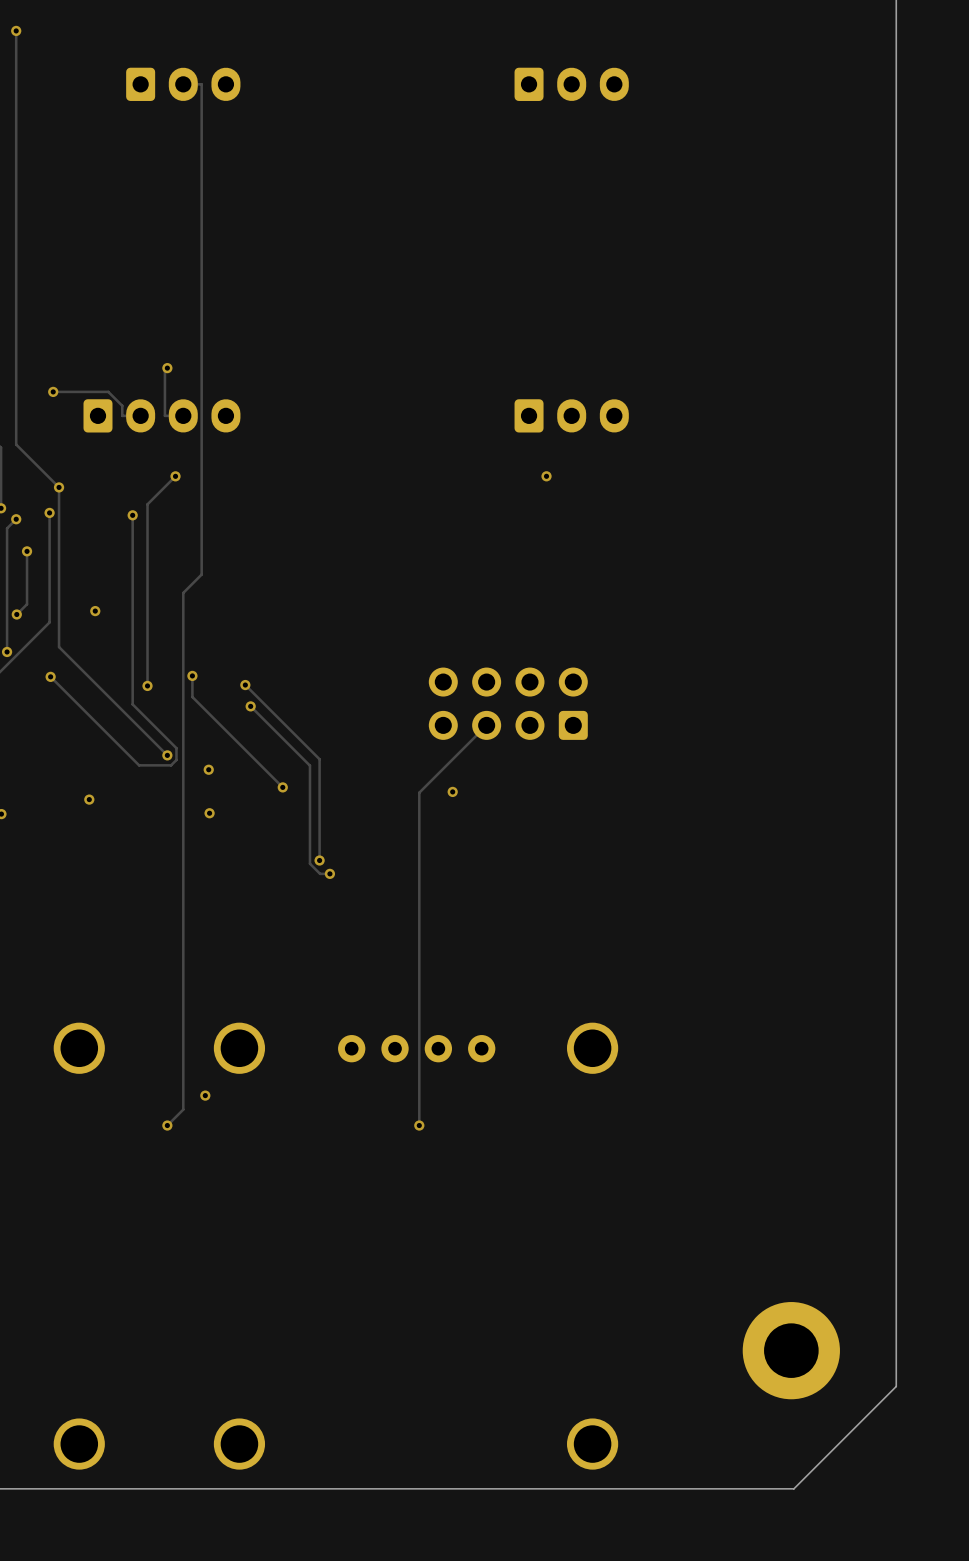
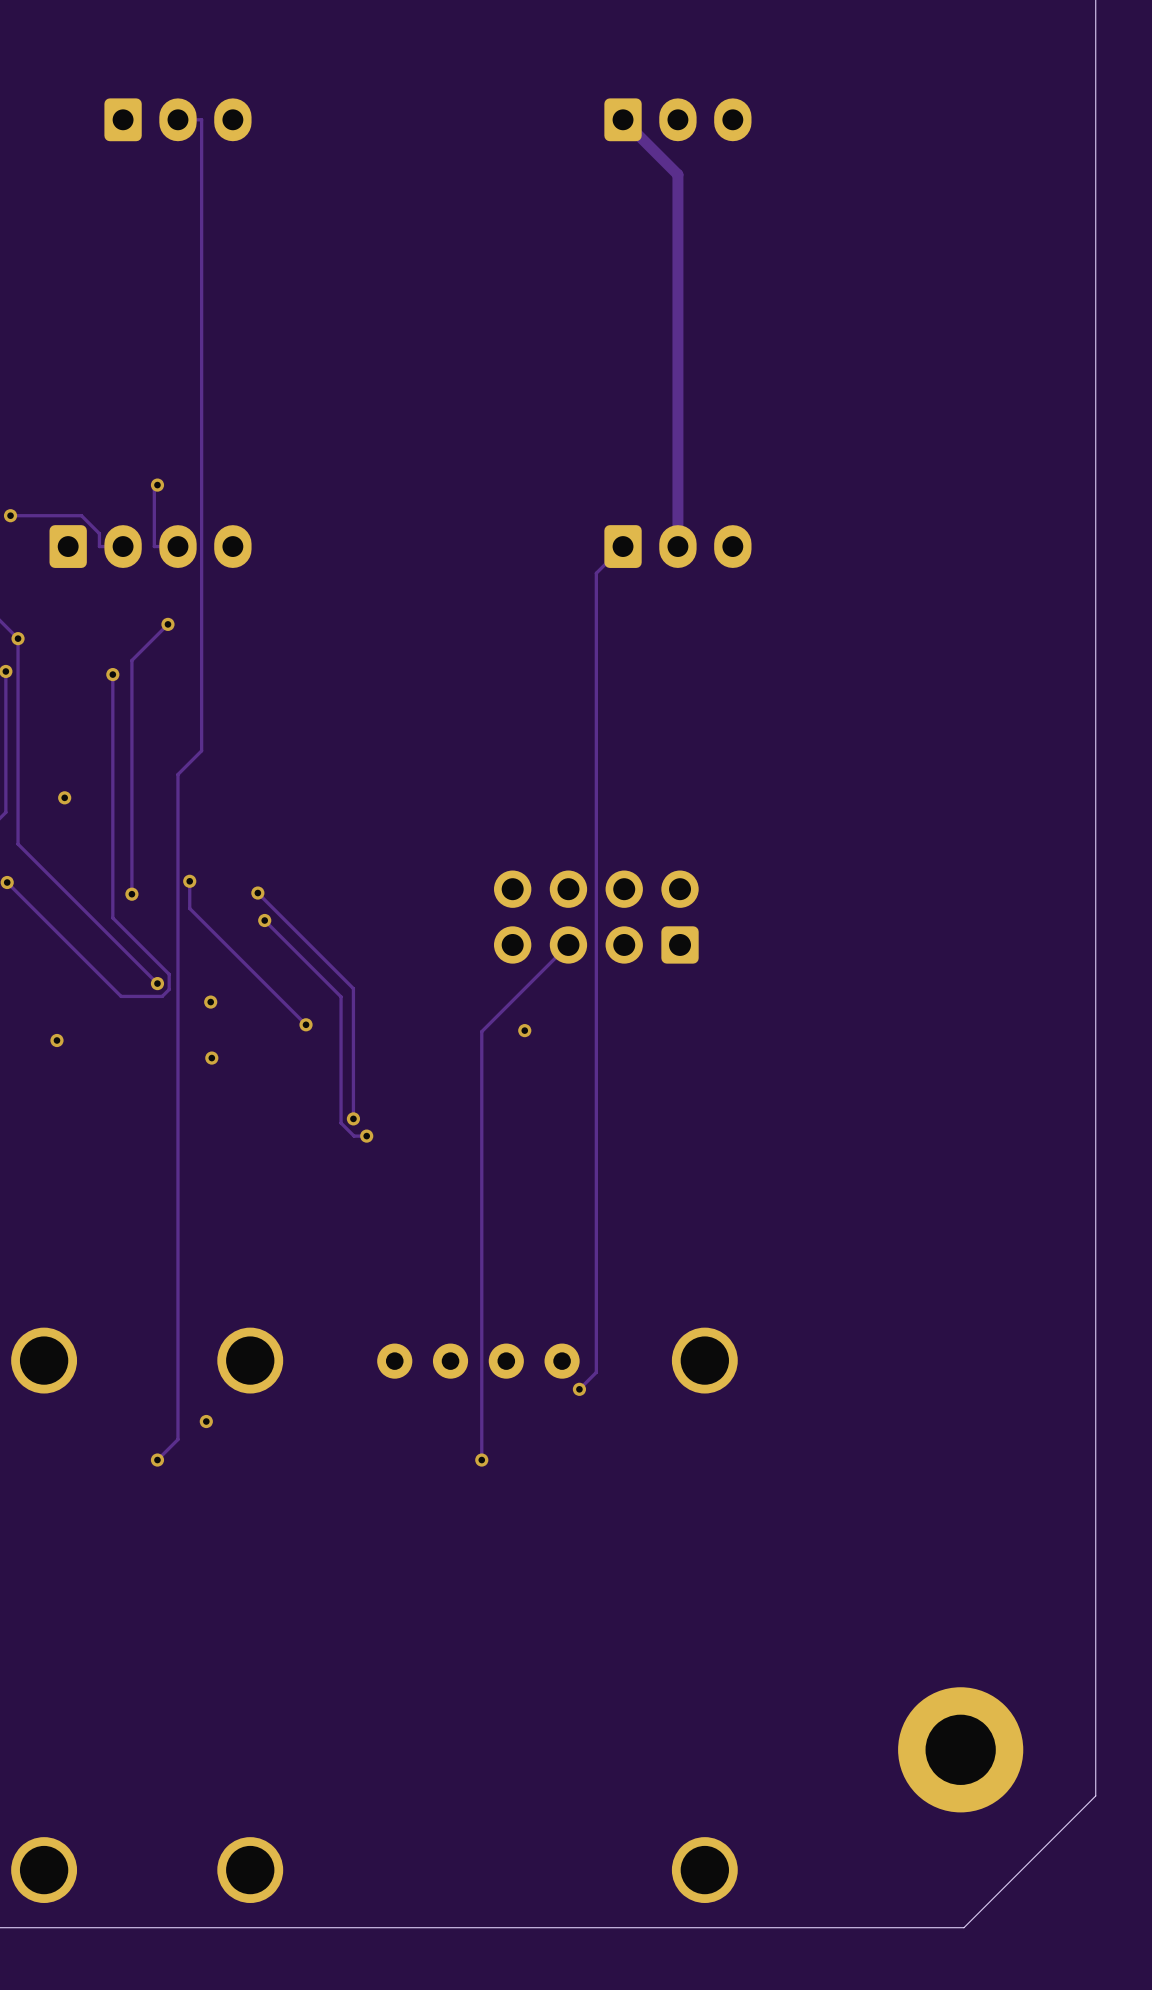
track: none -> (623, 119) (677, 174) (677, 546)
track: none -> (623, 546) (596, 573) (596, 1372) (579, 1389)
via: (546, 476) -> none
via: none -> (579, 1389)

